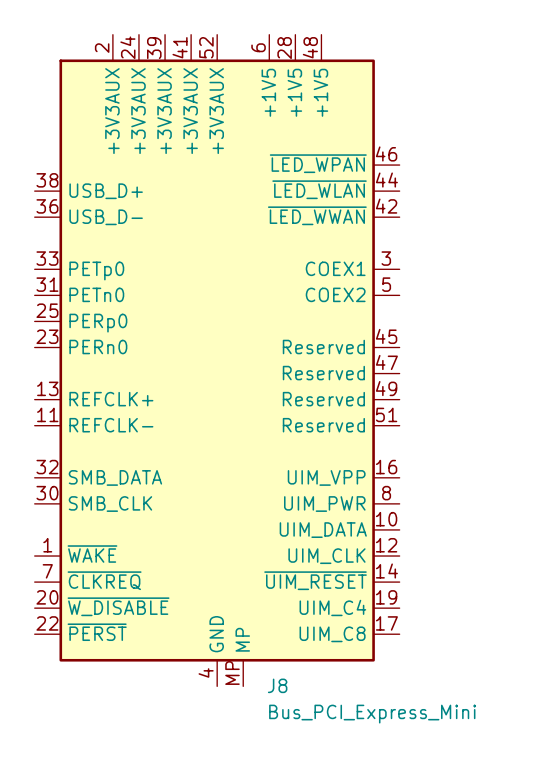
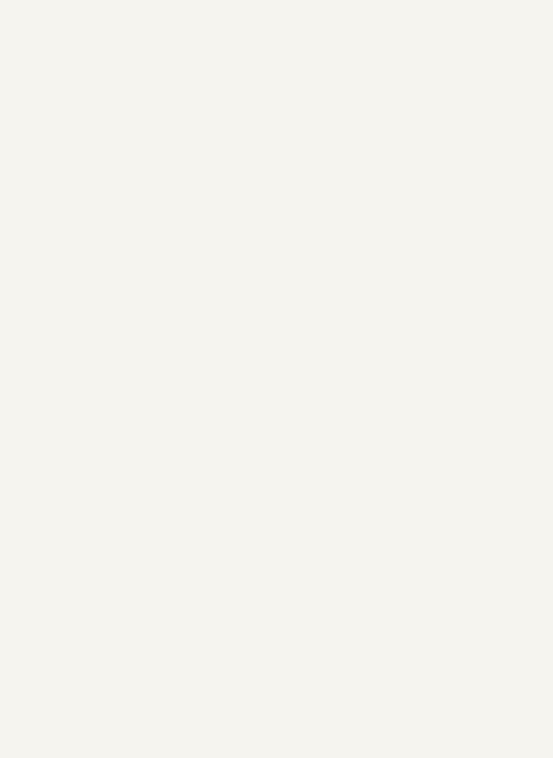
J8: Bus_PCI_Express_Mini (217, 360) -> none

